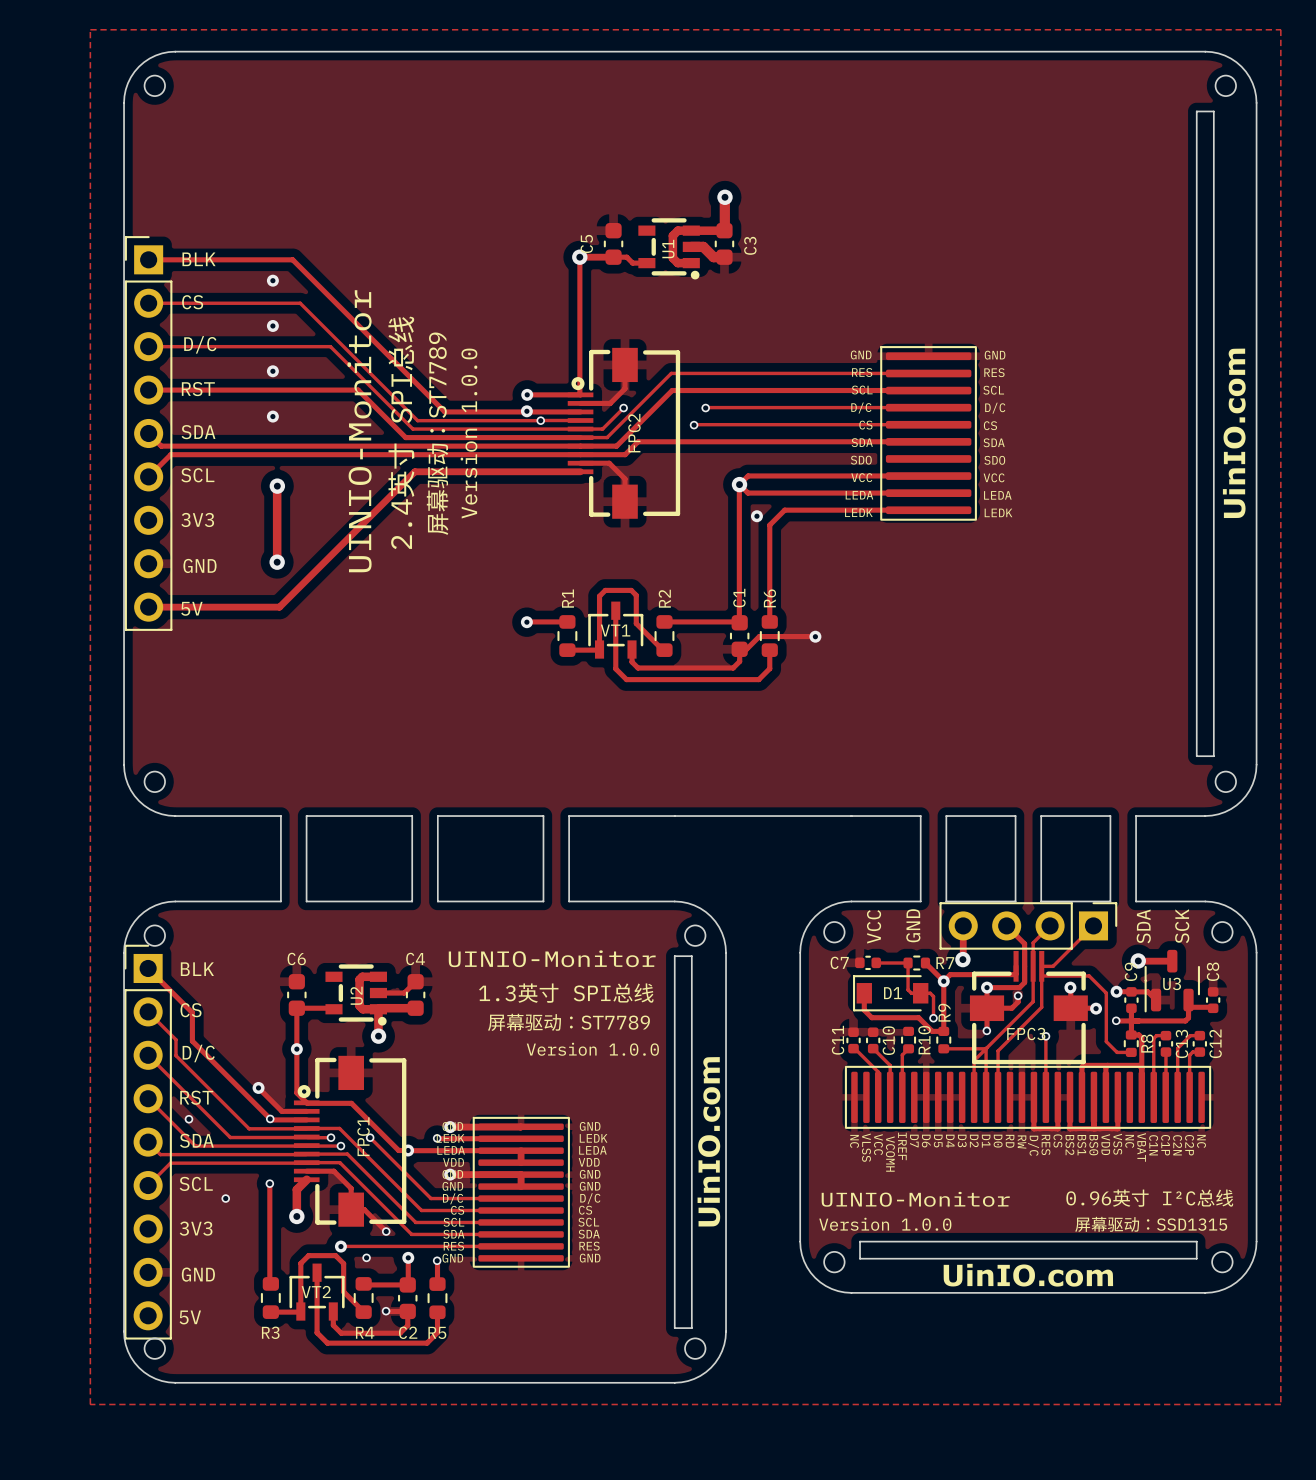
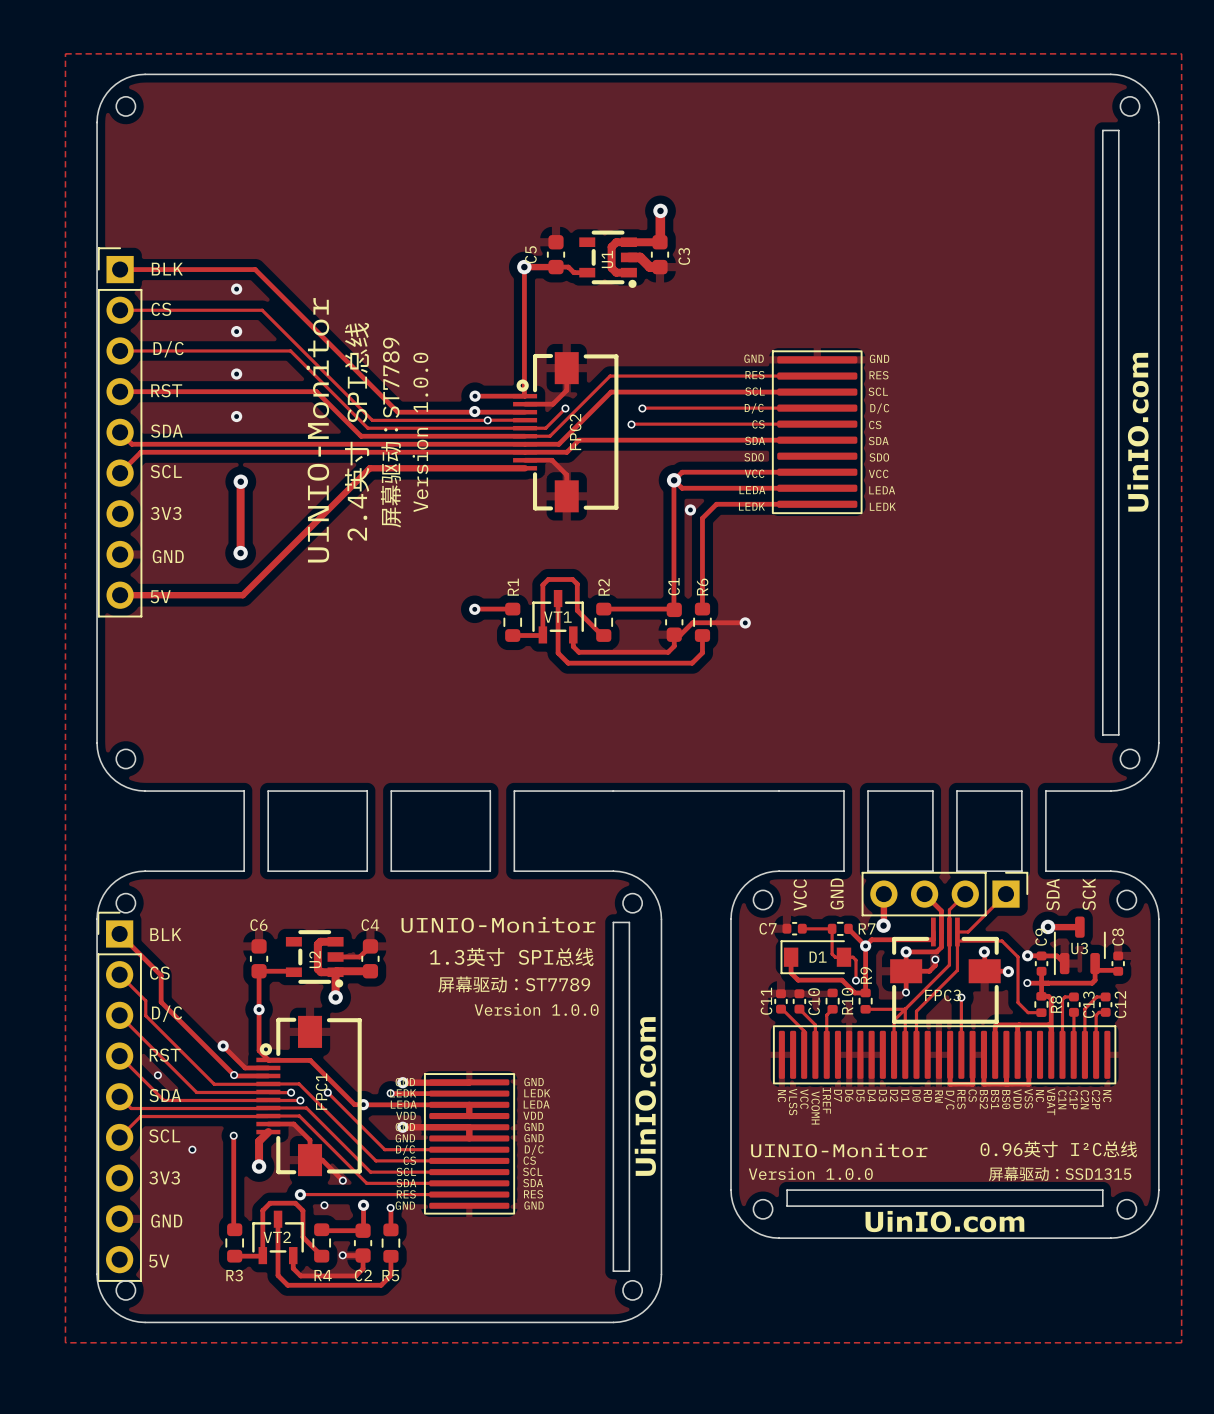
part position: (928, 433) -> (817, 432)

